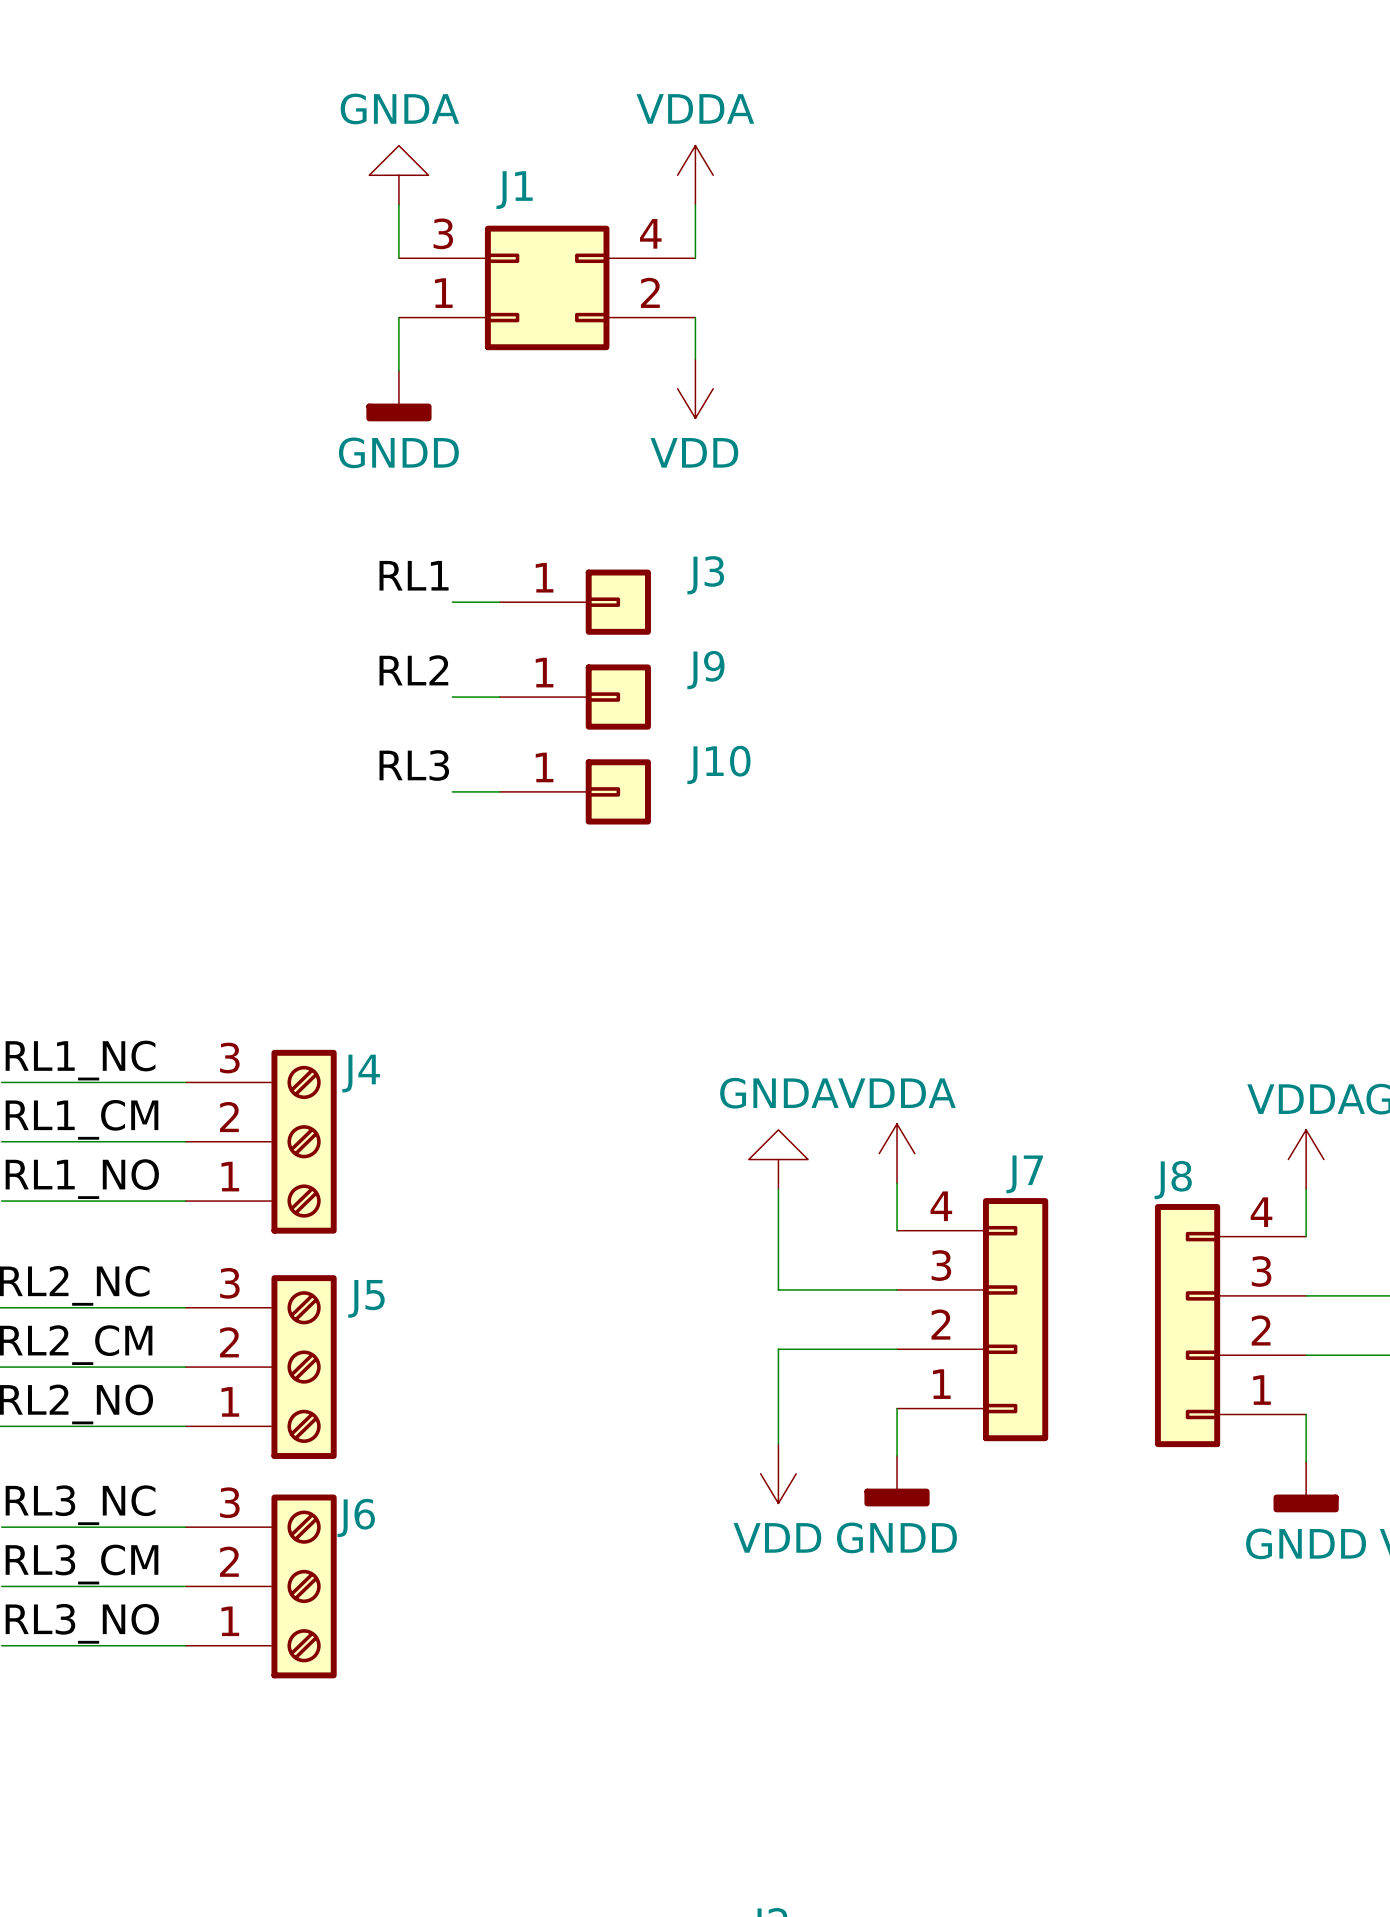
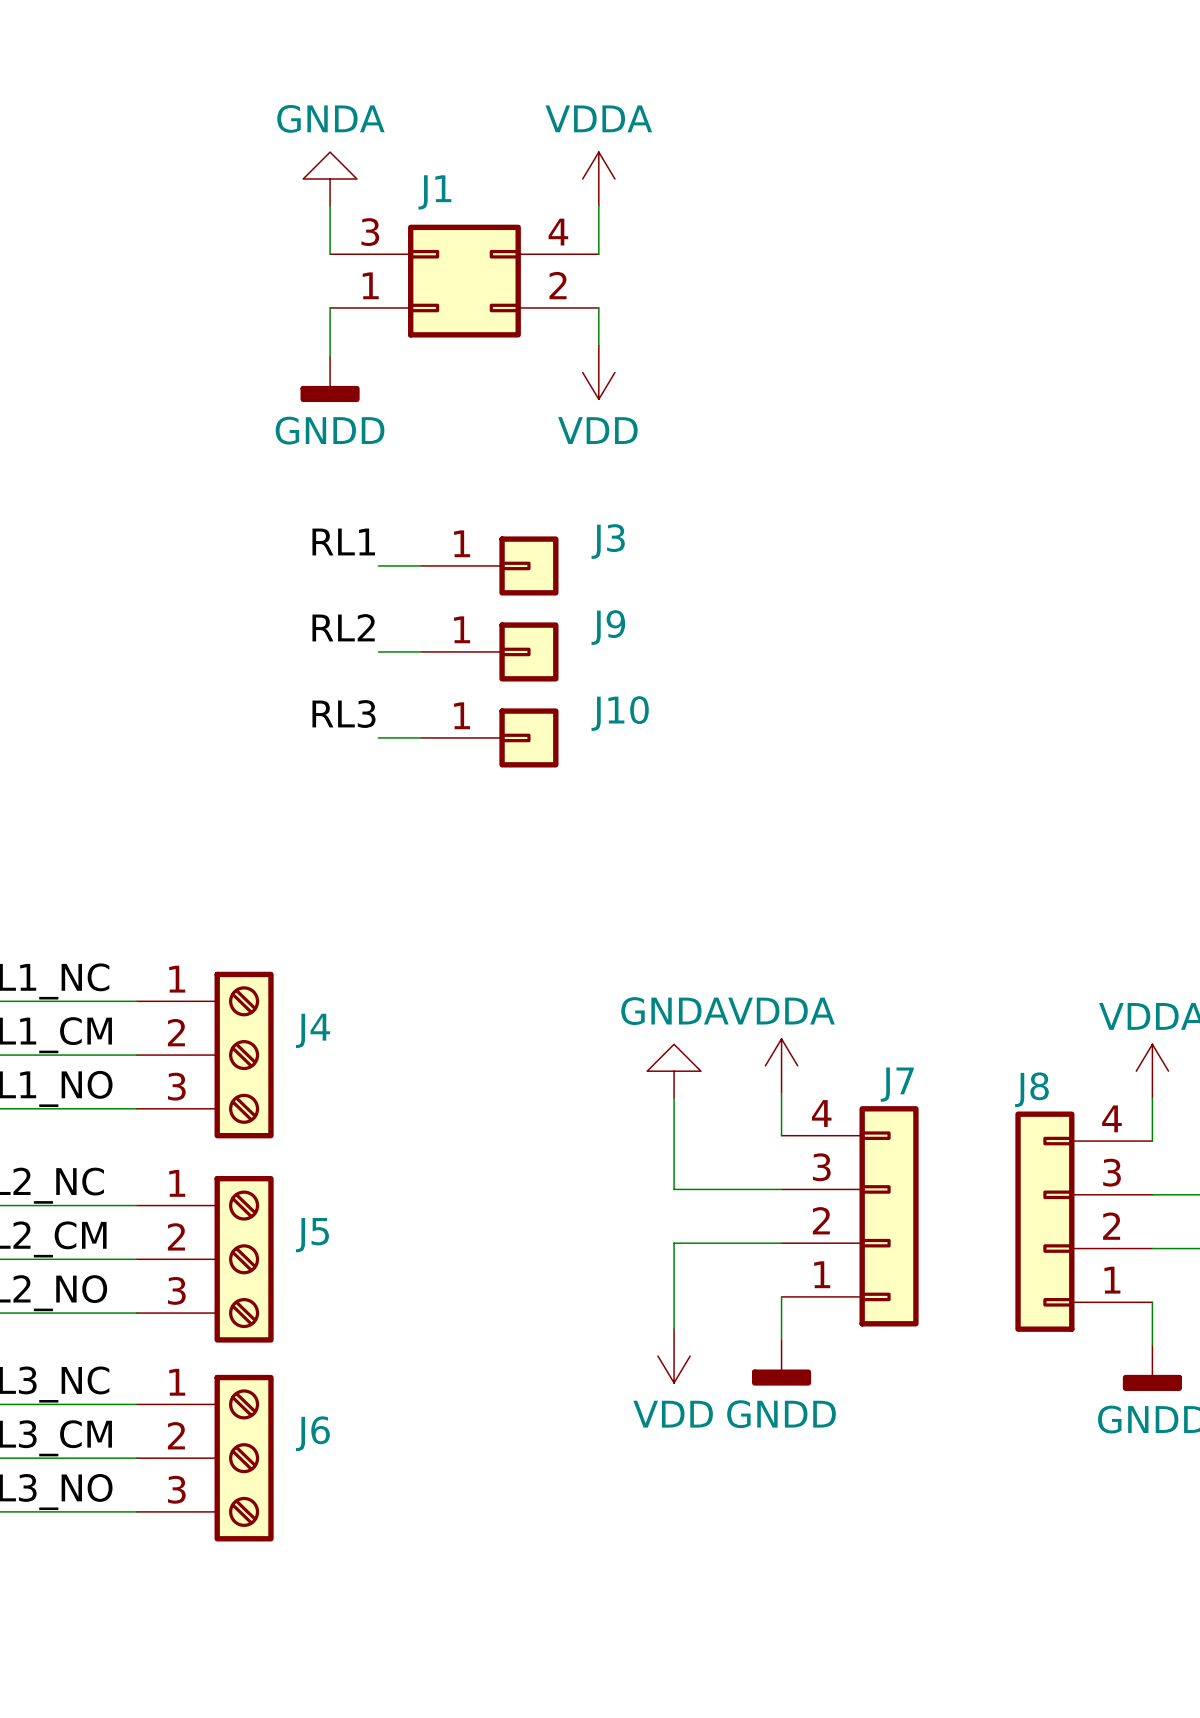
J4 name position: J4 (361, 1073) -> J4 (313, 1030)
J4 flip: as is (304, 1141) -> up-down (244, 1055)
J5 name position: J5 (366, 1298) -> J5 (312, 1235)
J5 flip: as is (304, 1367) -> up-down (244, 1259)
J6 name position: J6 (356, 1517) -> J6 (312, 1433)
J6 flip: as is (304, 1586) -> up-down (244, 1458)

